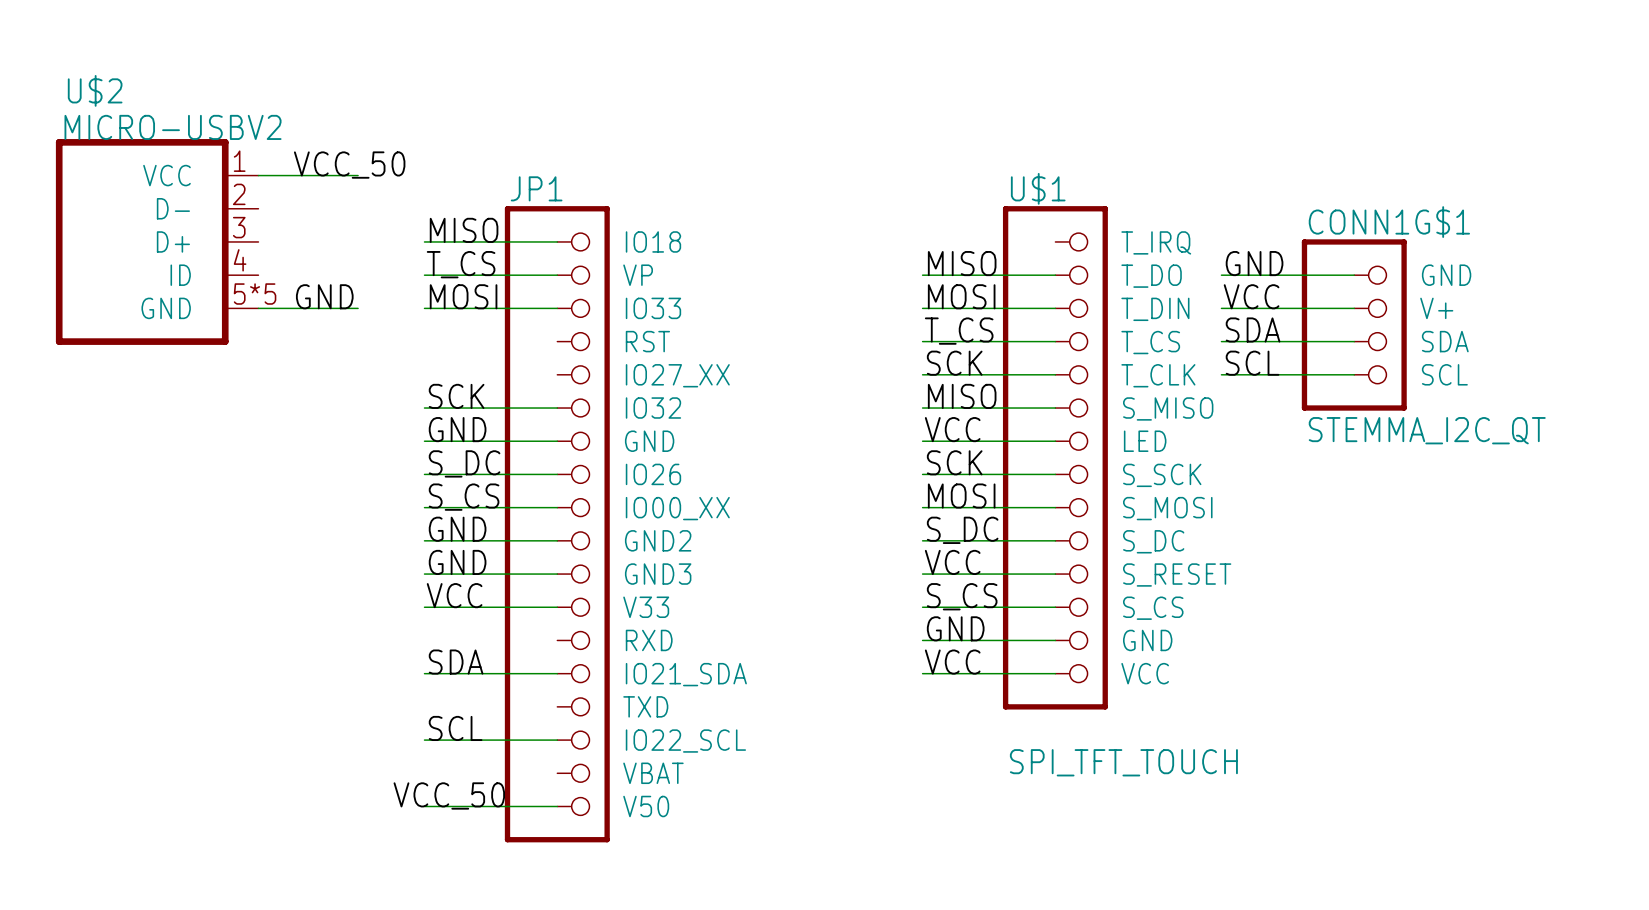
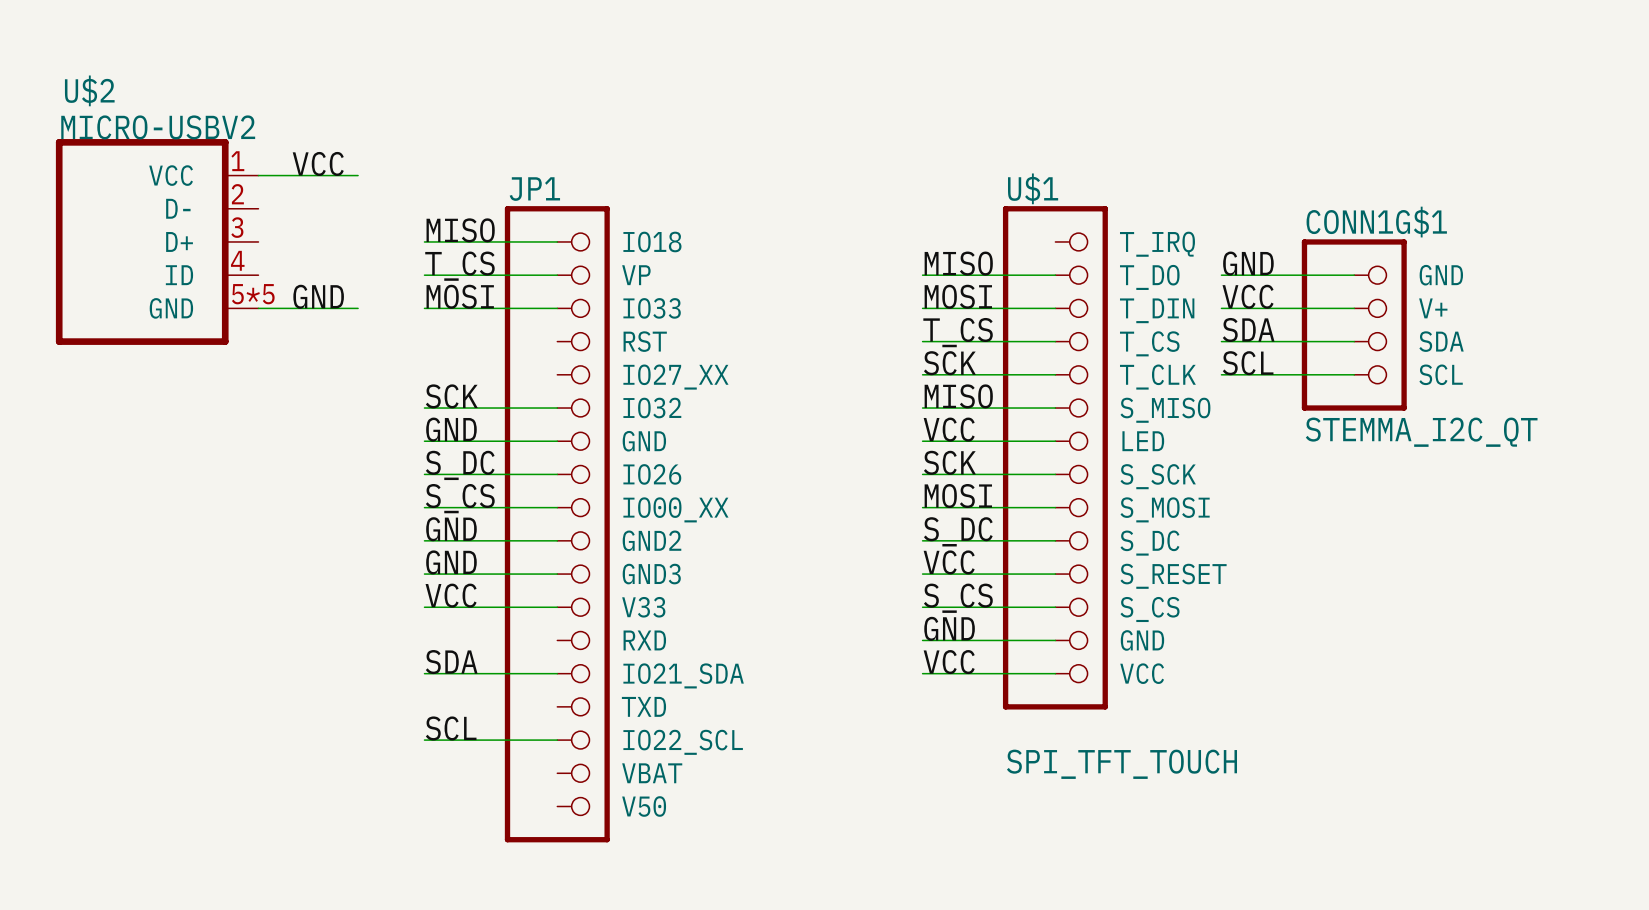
label: VCC_50 (349, 165) -> VCC (318, 163)
label: VCC_50 (449, 795) -> none
wire: (424, 806) (557, 806) -> none

